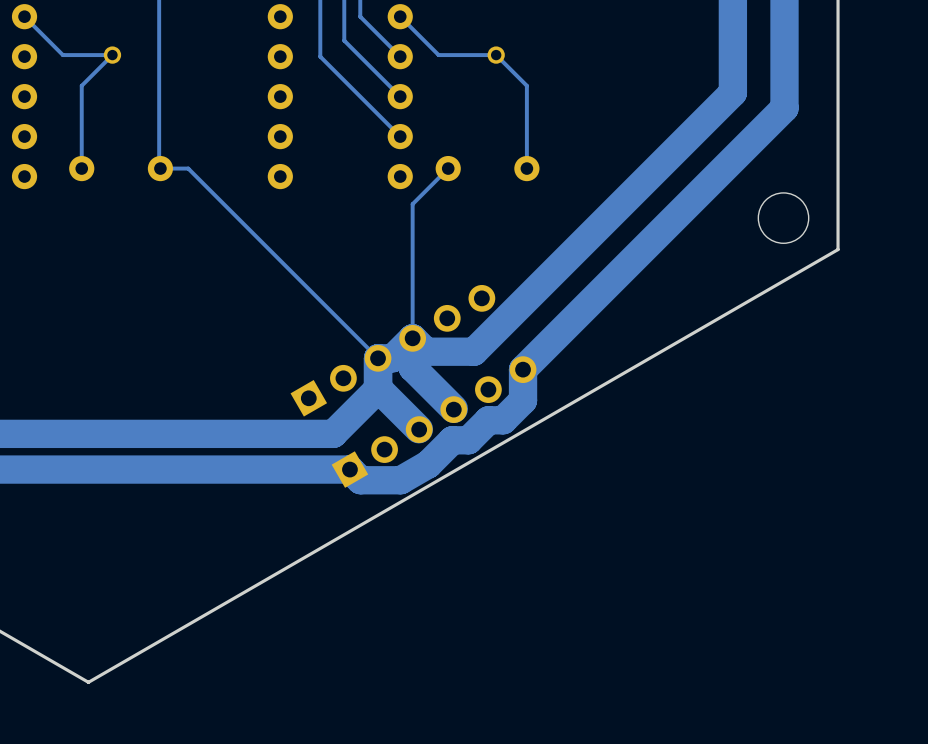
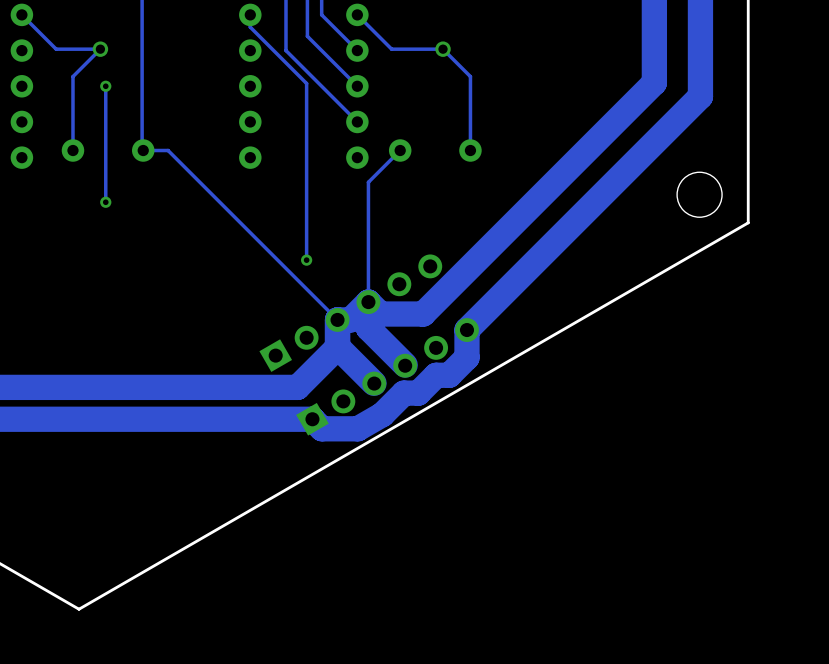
track: none -> (250, 14) (250, 27) (306, 83) (306, 260)
track: none -> (105, 86) (105, 202)
via: none -> (105, 86)
via: none -> (105, 202)
via: none -> (306, 260)

